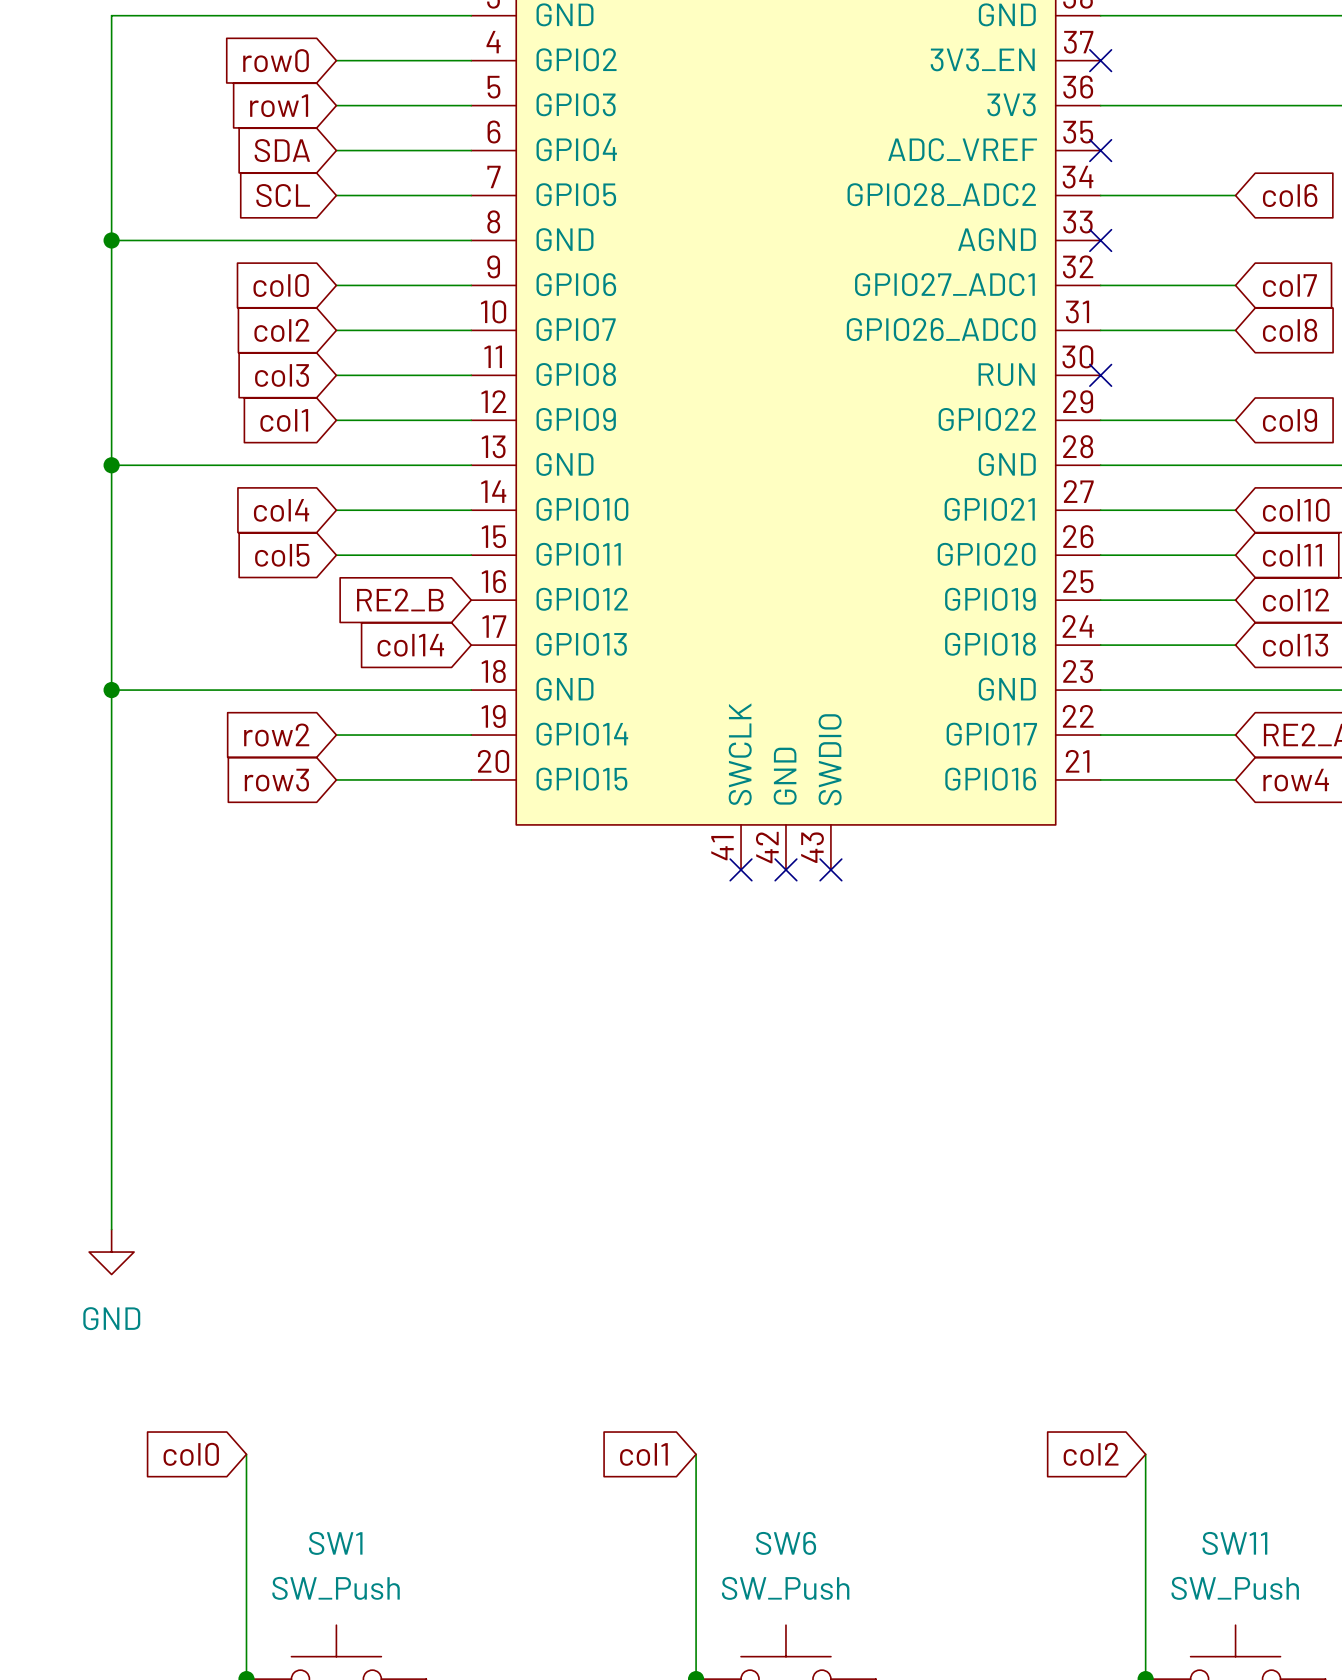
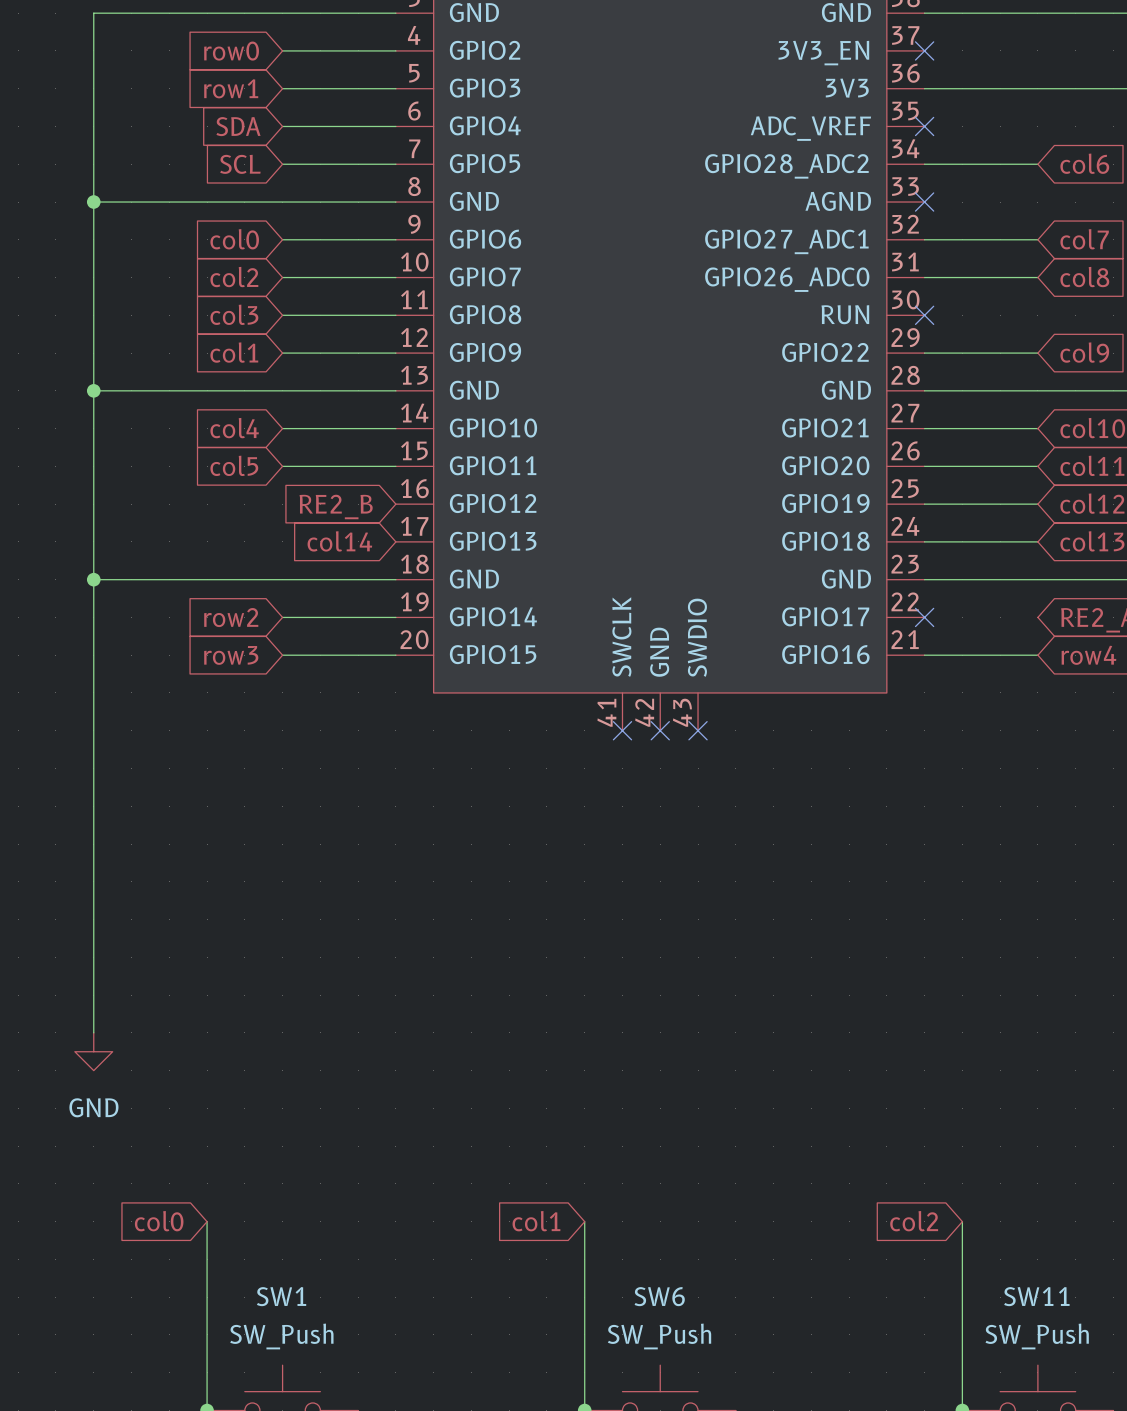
wire: (1100, 735) (1235, 735) -> none
no-connect mark: none -> (924, 617)

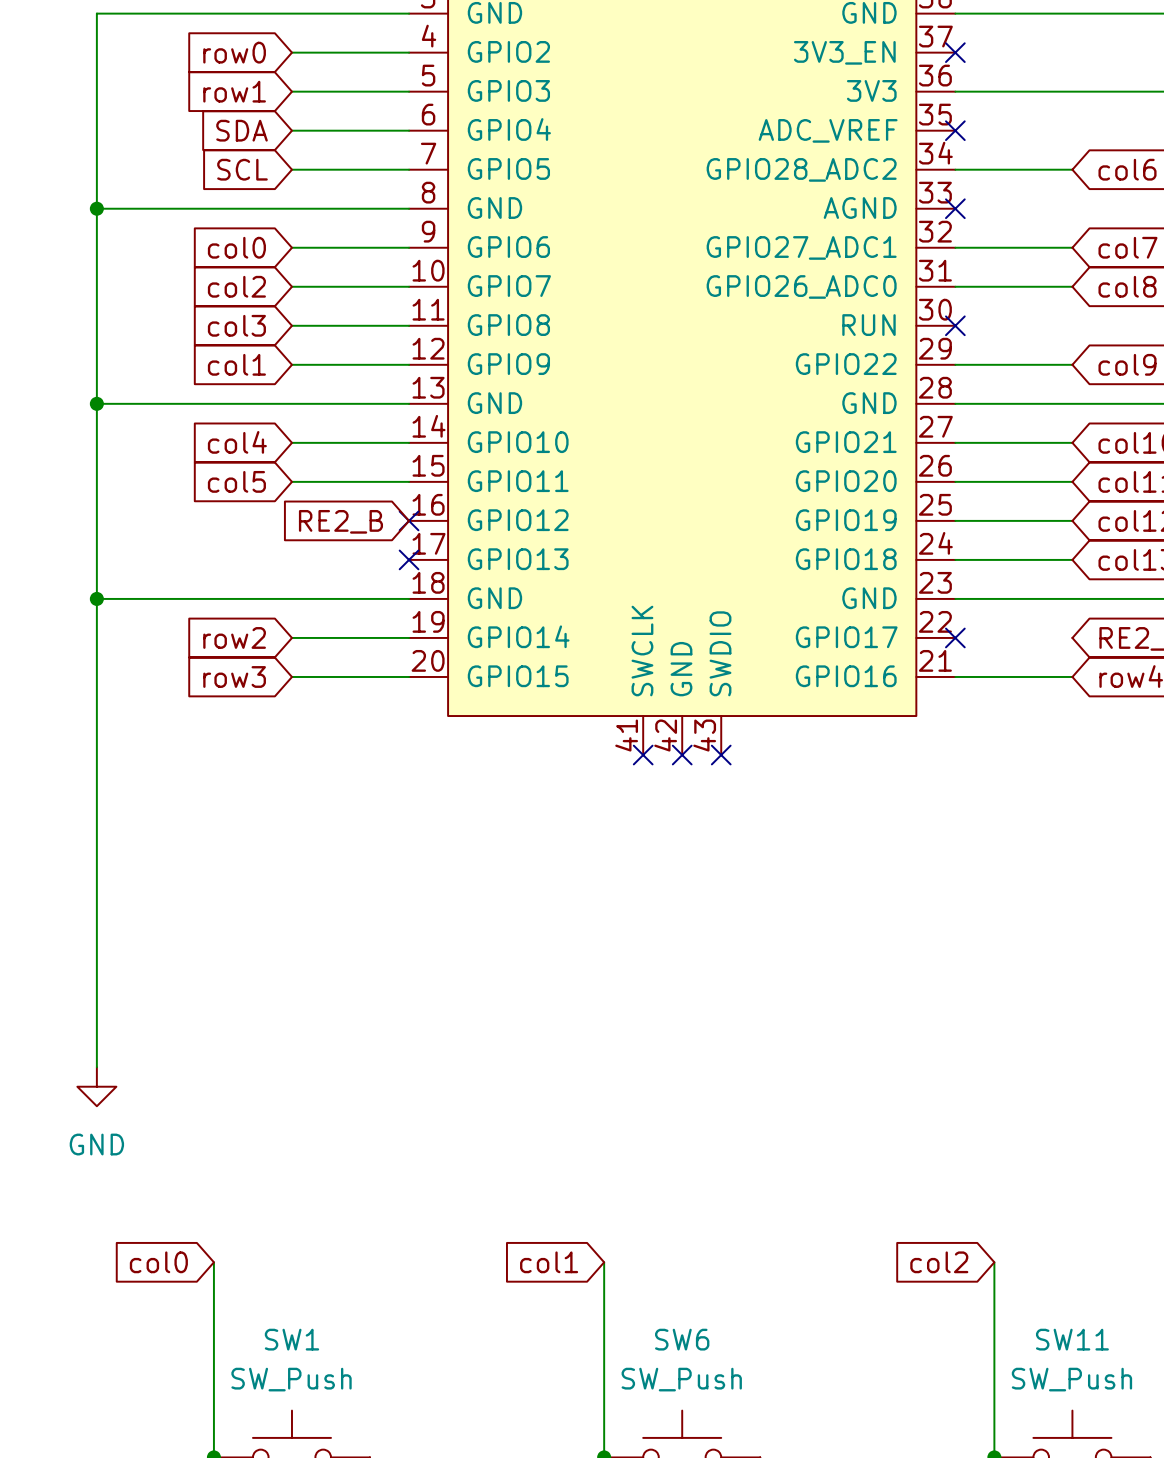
no-connect mark: none -> (409, 520)
global label: col14 (339, 541) -> none
no-connect mark: none -> (409, 559)

